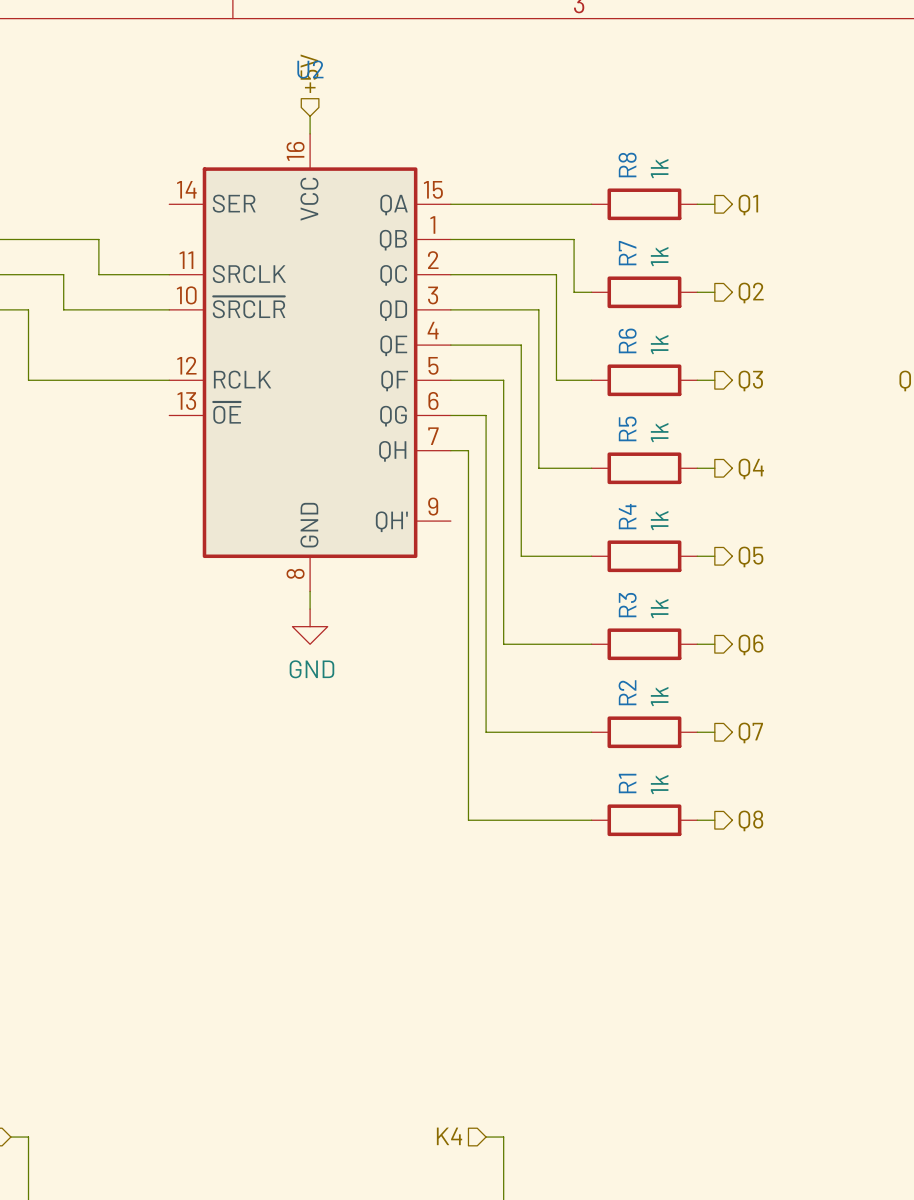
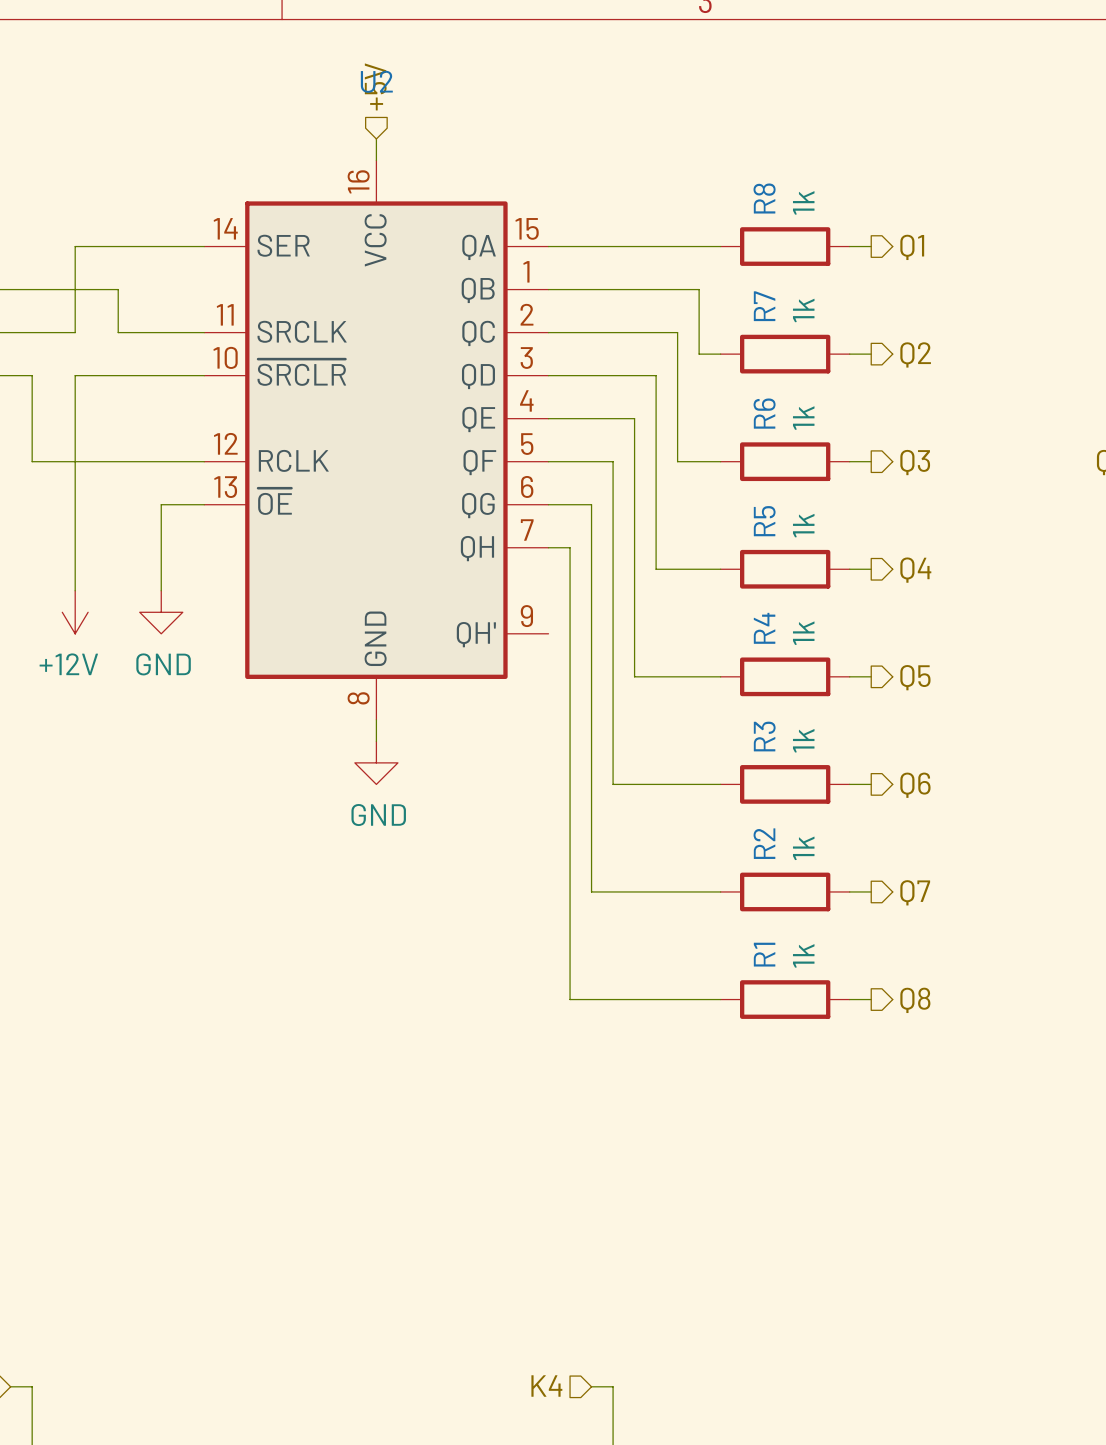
wire: (63, 274) (63, 309) -> (75, 332) (75, 246) (204, 246)
wire: none -> (75, 375) (75, 590)
wire: none -> (204, 504) (161, 504) (161, 590)
power symbol: none -> +12V (75, 612)
power symbol: none -> GND (161, 612)

